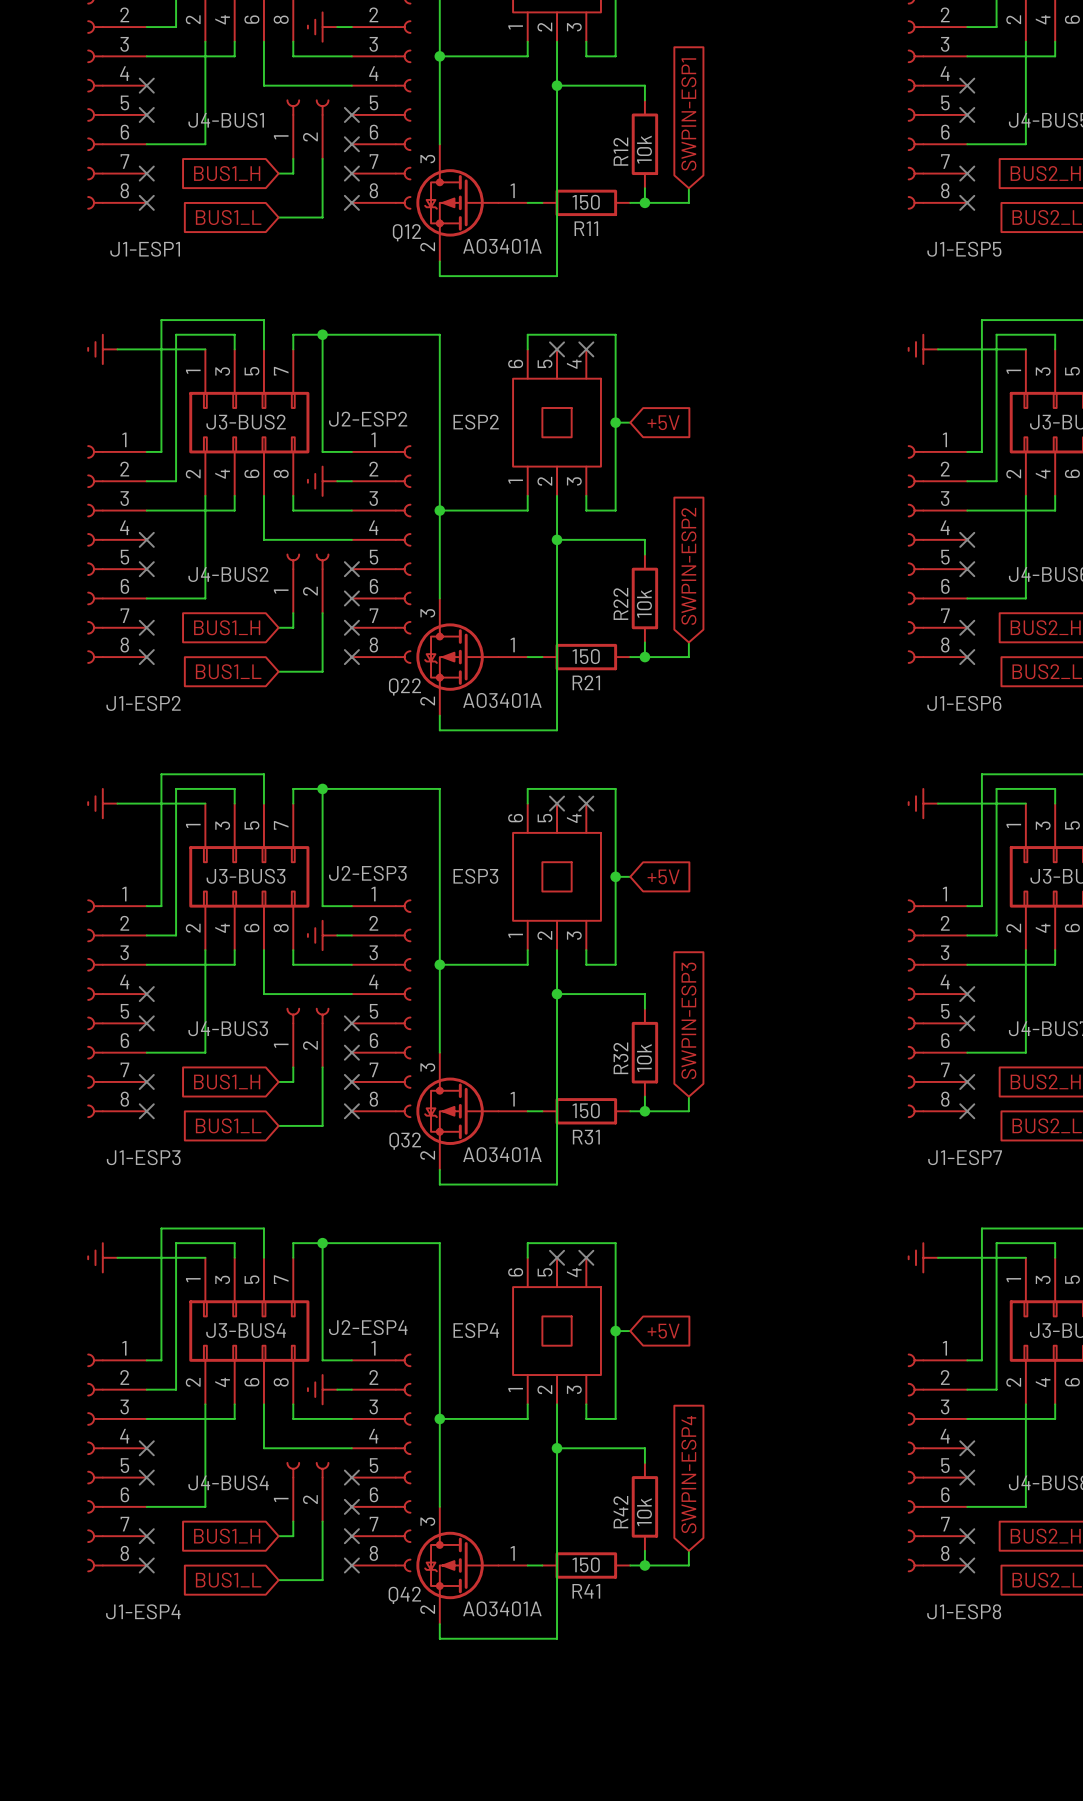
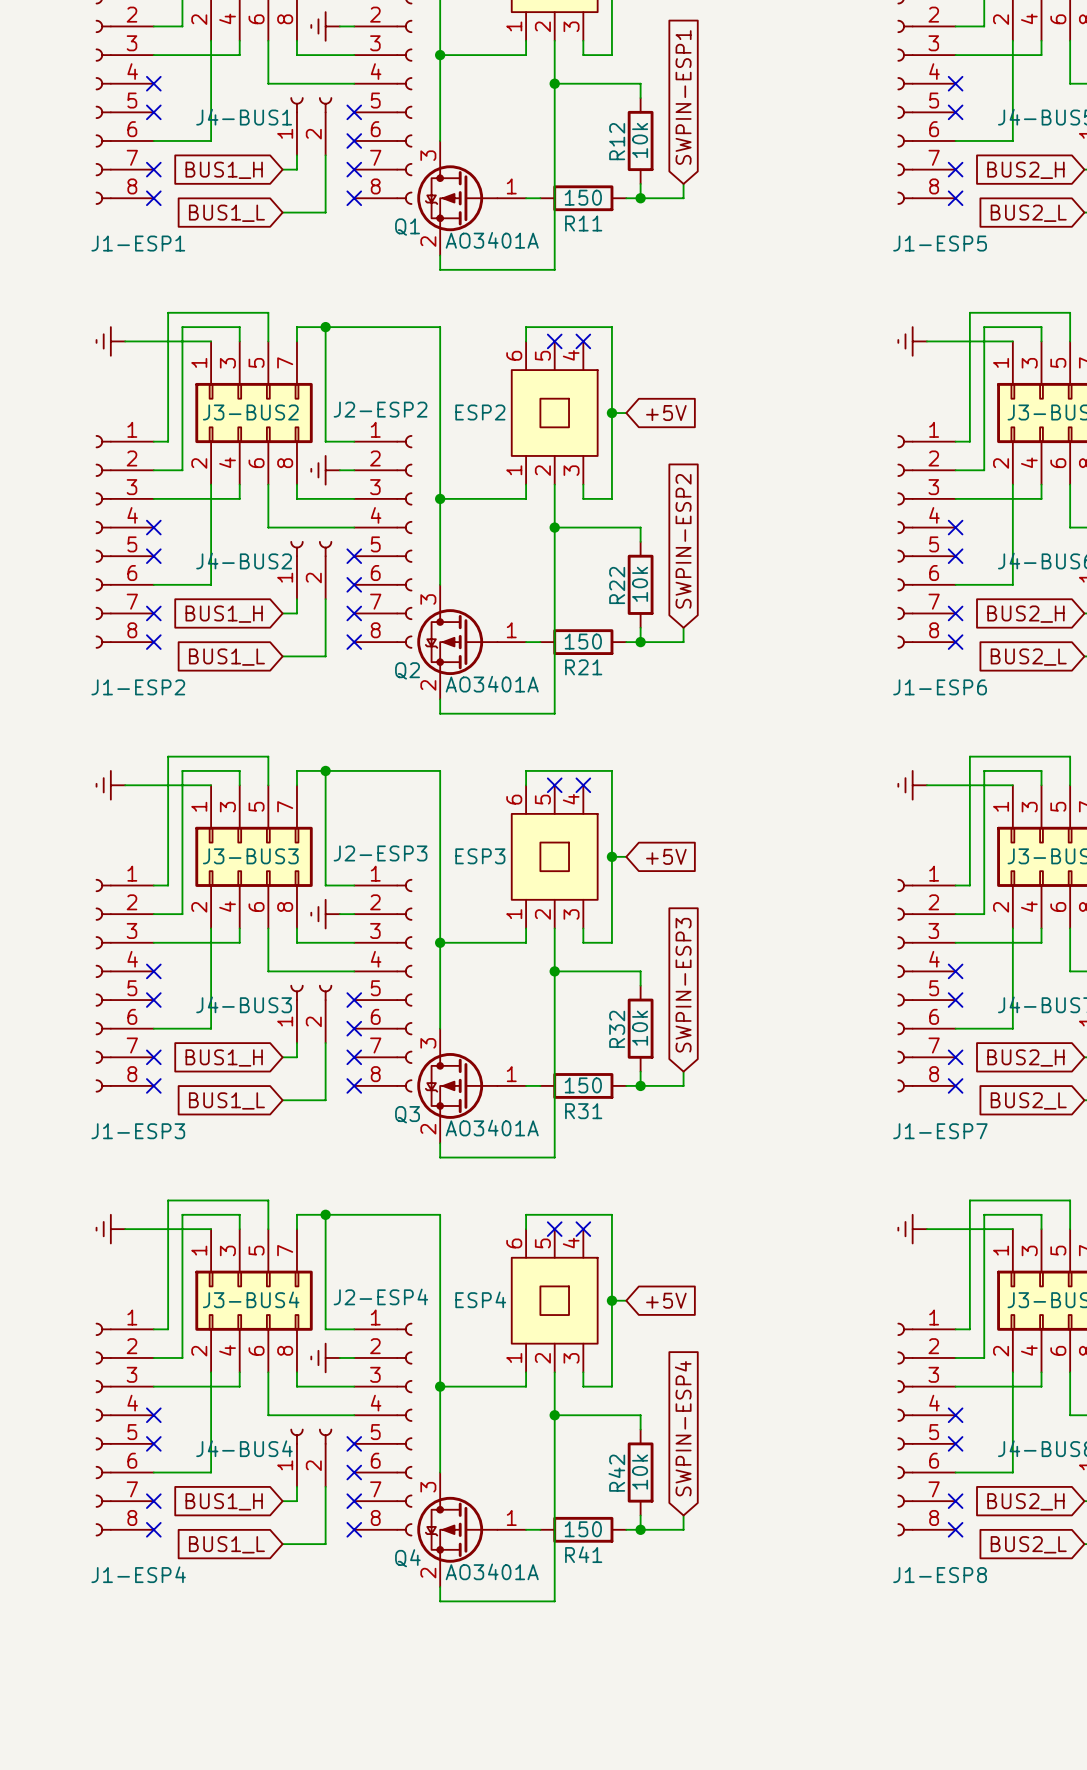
Q12 name: Q12 (406, 232) -> Q1 (407, 227)
Q22 name: Q22 (404, 686) -> Q2 (407, 670)
Q32 name: Q32 (405, 1141) -> Q3 (407, 1114)
Q42 name: Q42 (404, 1595) -> Q4 (407, 1558)

